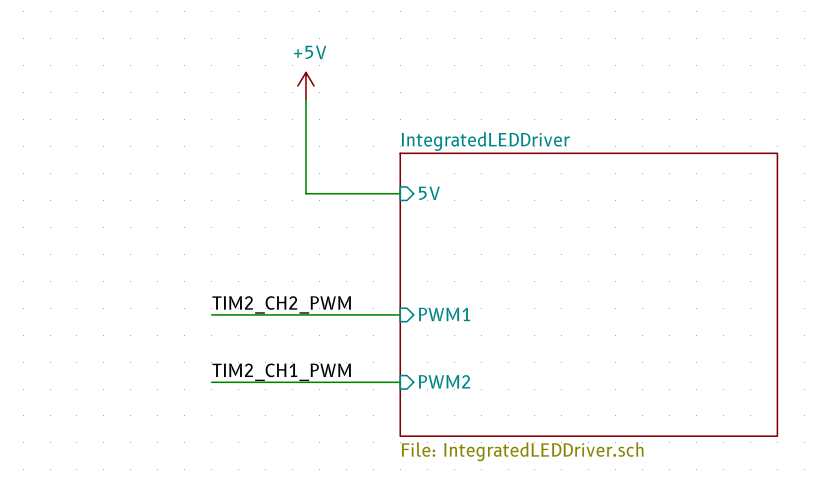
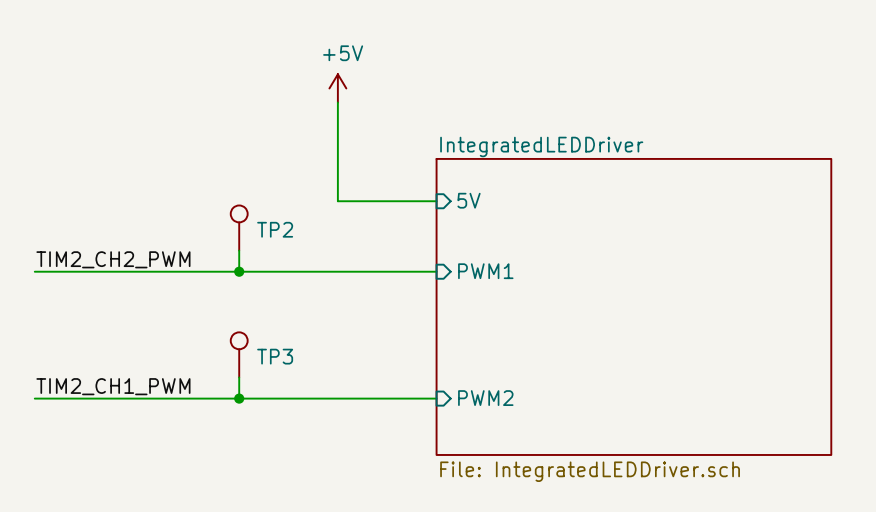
TP2: none -> (239, 228)
wire: none -> (239, 250) (239, 271)
wire: none -> (34, 271) (436, 271)
junction: none -> (239, 271)
label position: TIM2_CH2_PWM (281, 304) -> TIM2_CH2_PWM (113, 259)
wire: (211, 314) (400, 314) -> none
sheet pin position: PWM1 (444, 314) -> PWM1 (485, 271)
TP3: none -> (239, 354)
wire: none -> (239, 377) (239, 398) (34, 398)
label position: TIM2_CH1_PWM (281, 372) -> TIM2_CH1_PWM (113, 386)
junction: none -> (239, 398)

